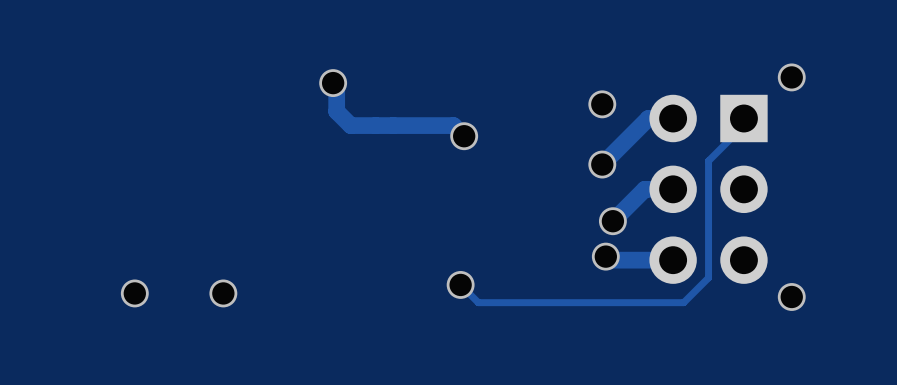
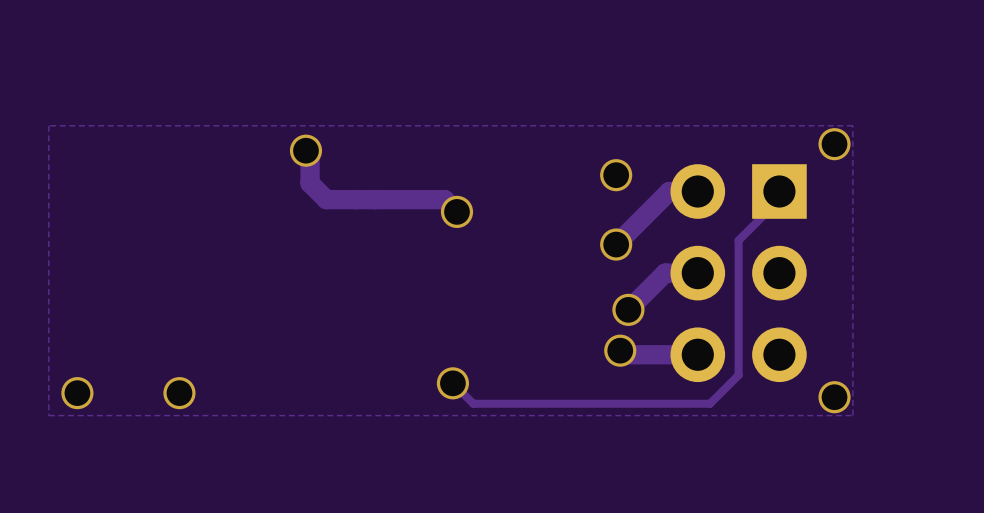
zone outline: none -> (852, 125) (852, 415) (48, 415) (48, 125) (852, 125)

